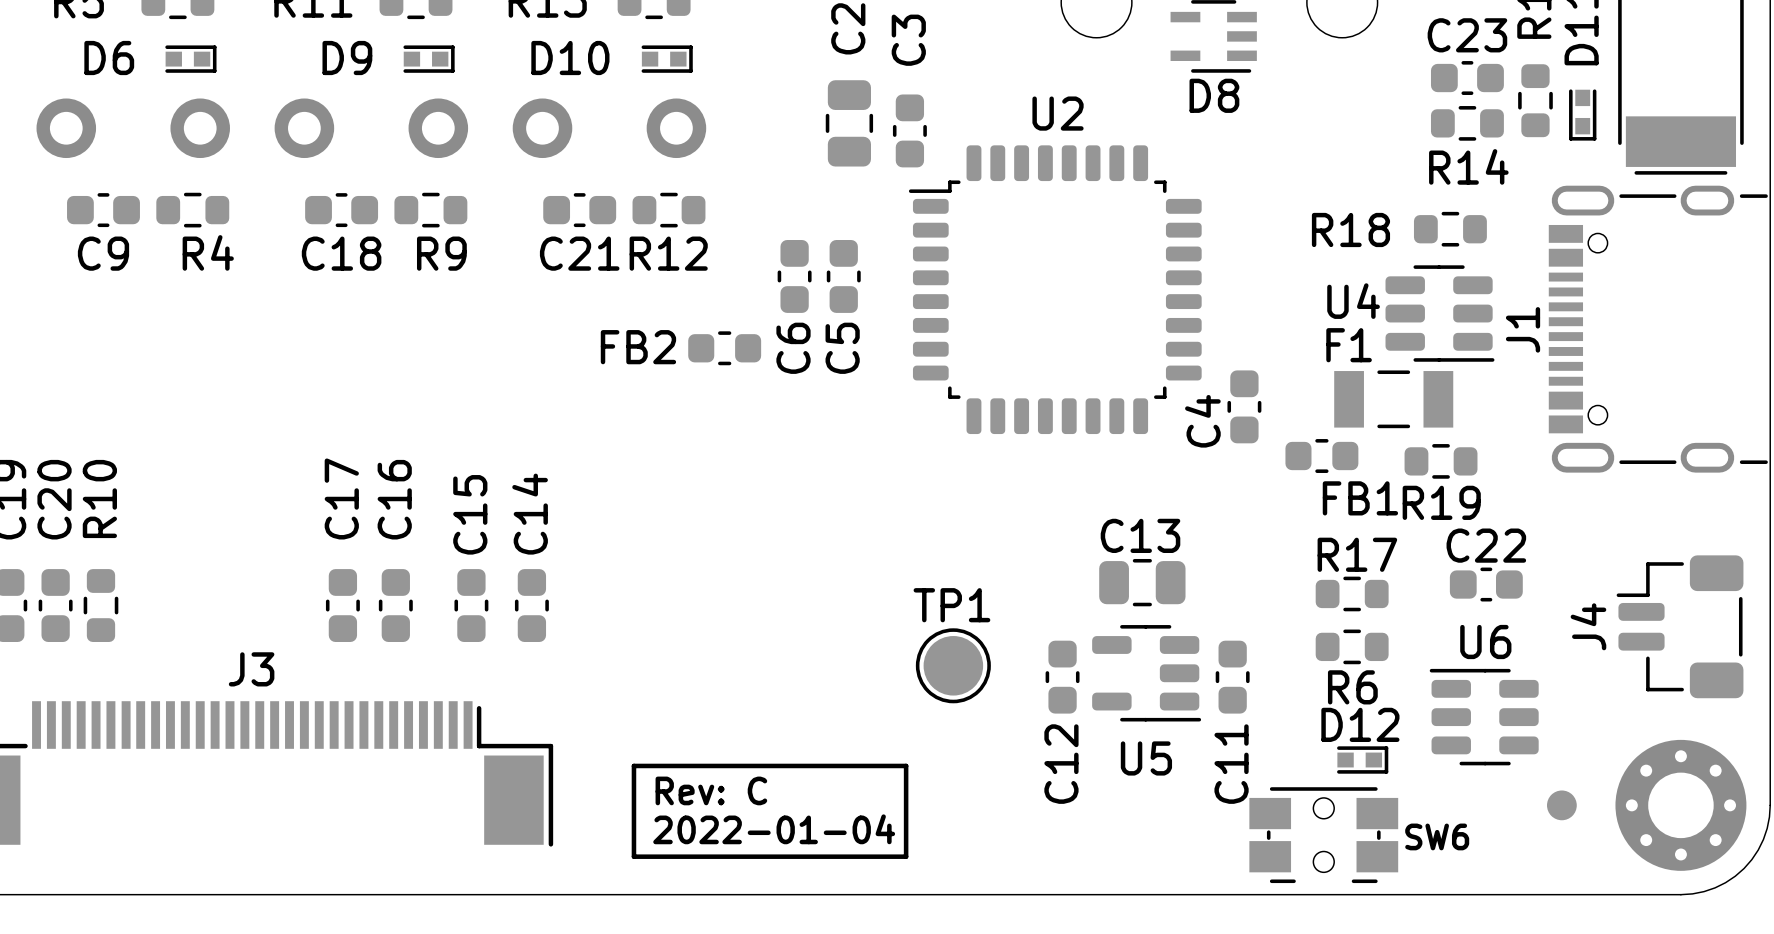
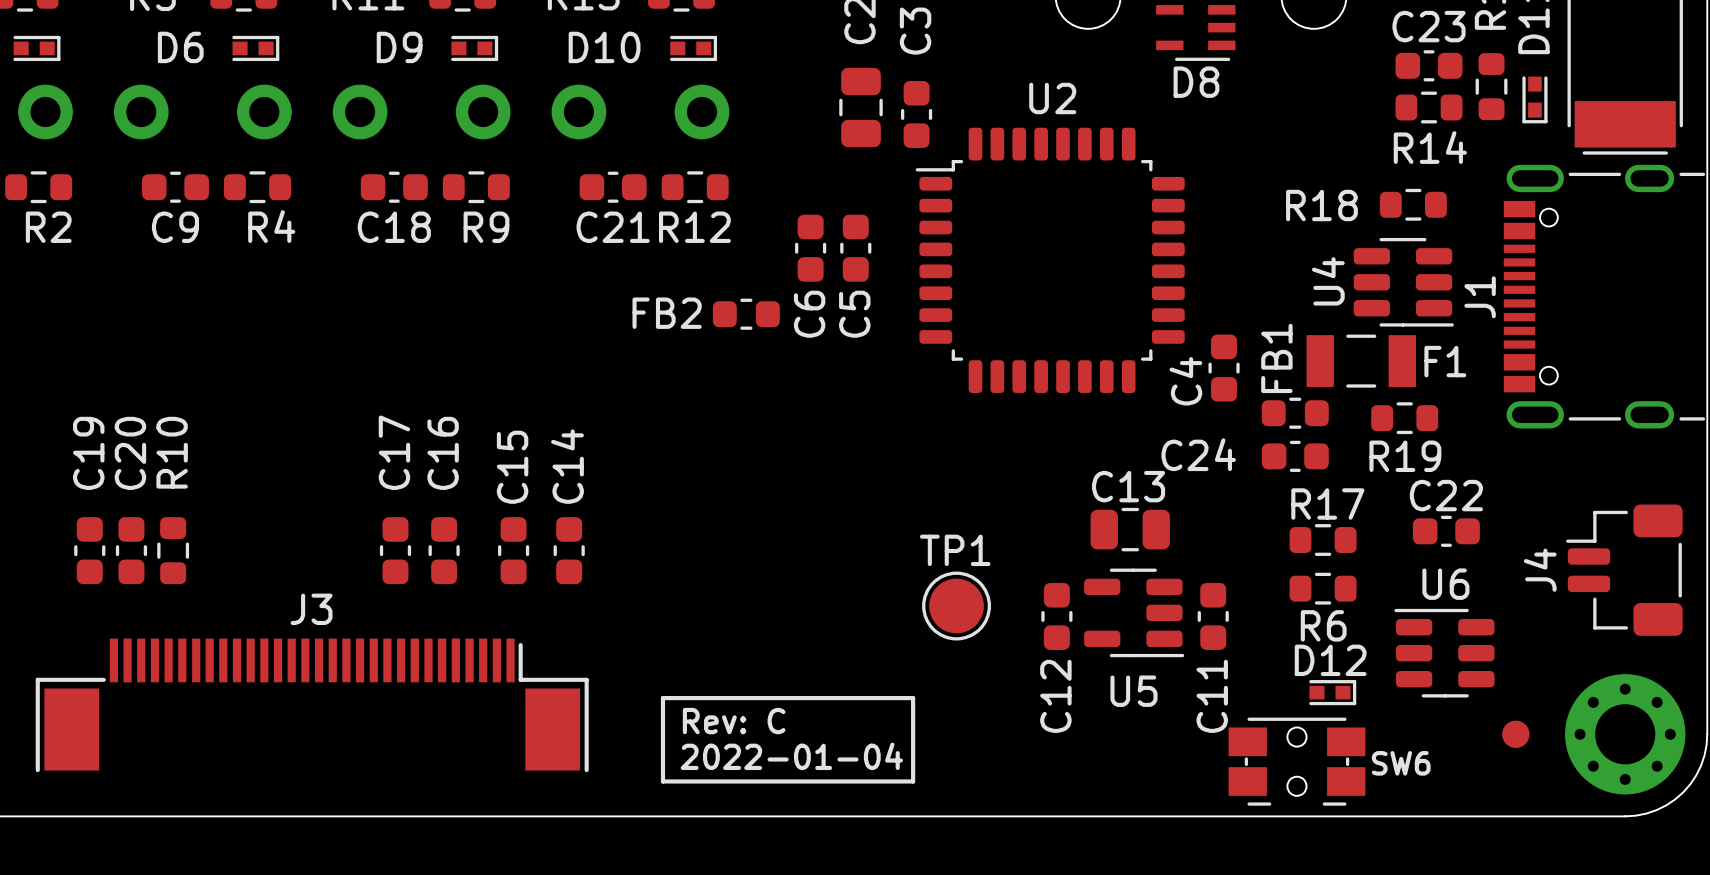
U4 name rotation: 0° (1353, 301) -> 90° counterclockwise (1328, 281)
F1 name position: F1 (1349, 345) -> F1 (1445, 361)
FB1 name rotation: 0° (1360, 498) -> 90° counterclockwise (1276, 358)
FB1 name position: FB1 (1360, 498) -> FB1 (1276, 358)
C24: none -> (1295, 456)

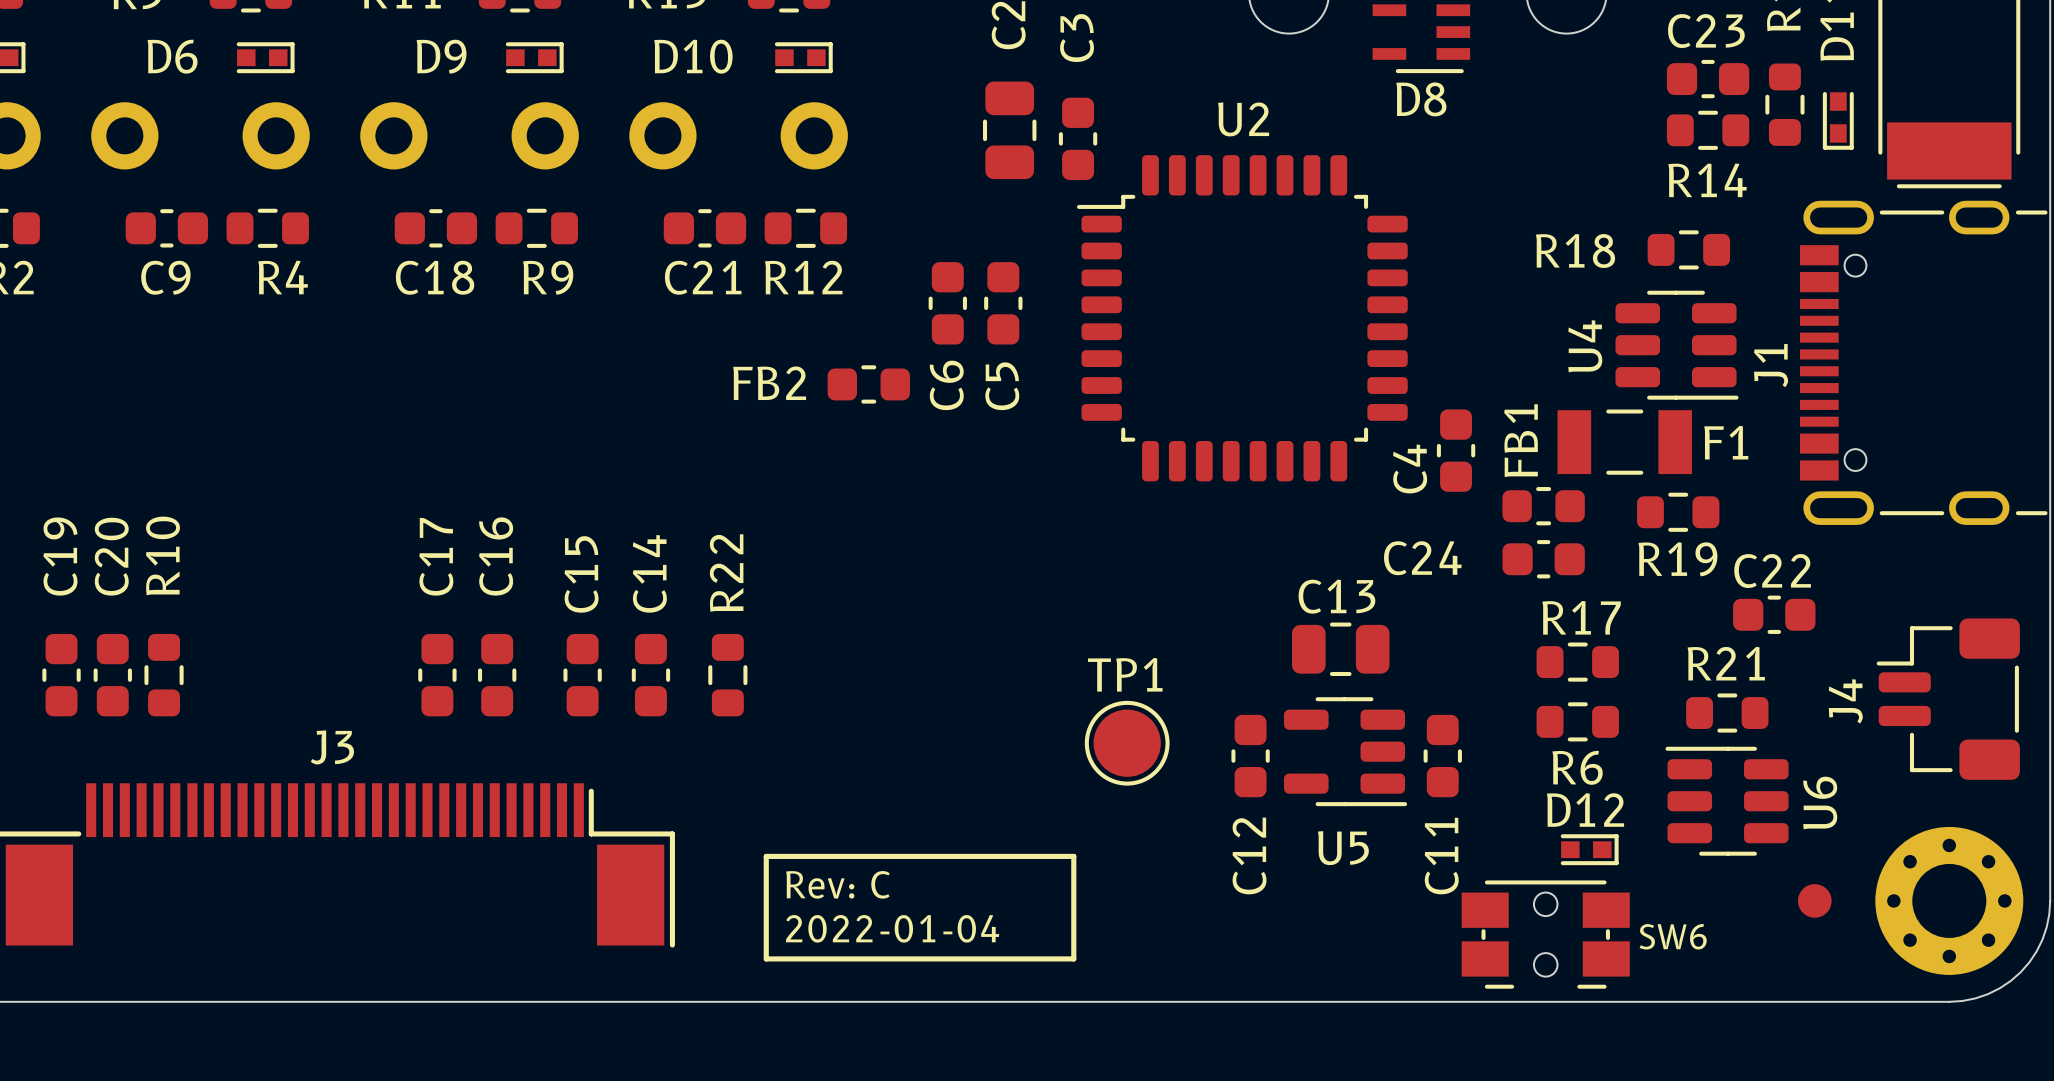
C22 position: (1446, 531) -> (1774, 614)
R22: none -> (727, 675)
R21: none -> (1727, 713)
U6 name rotation: 0° (1445, 584) -> 90° counterclockwise (1820, 802)
U6 name position: U6 (1445, 584) -> U6 (1820, 802)

